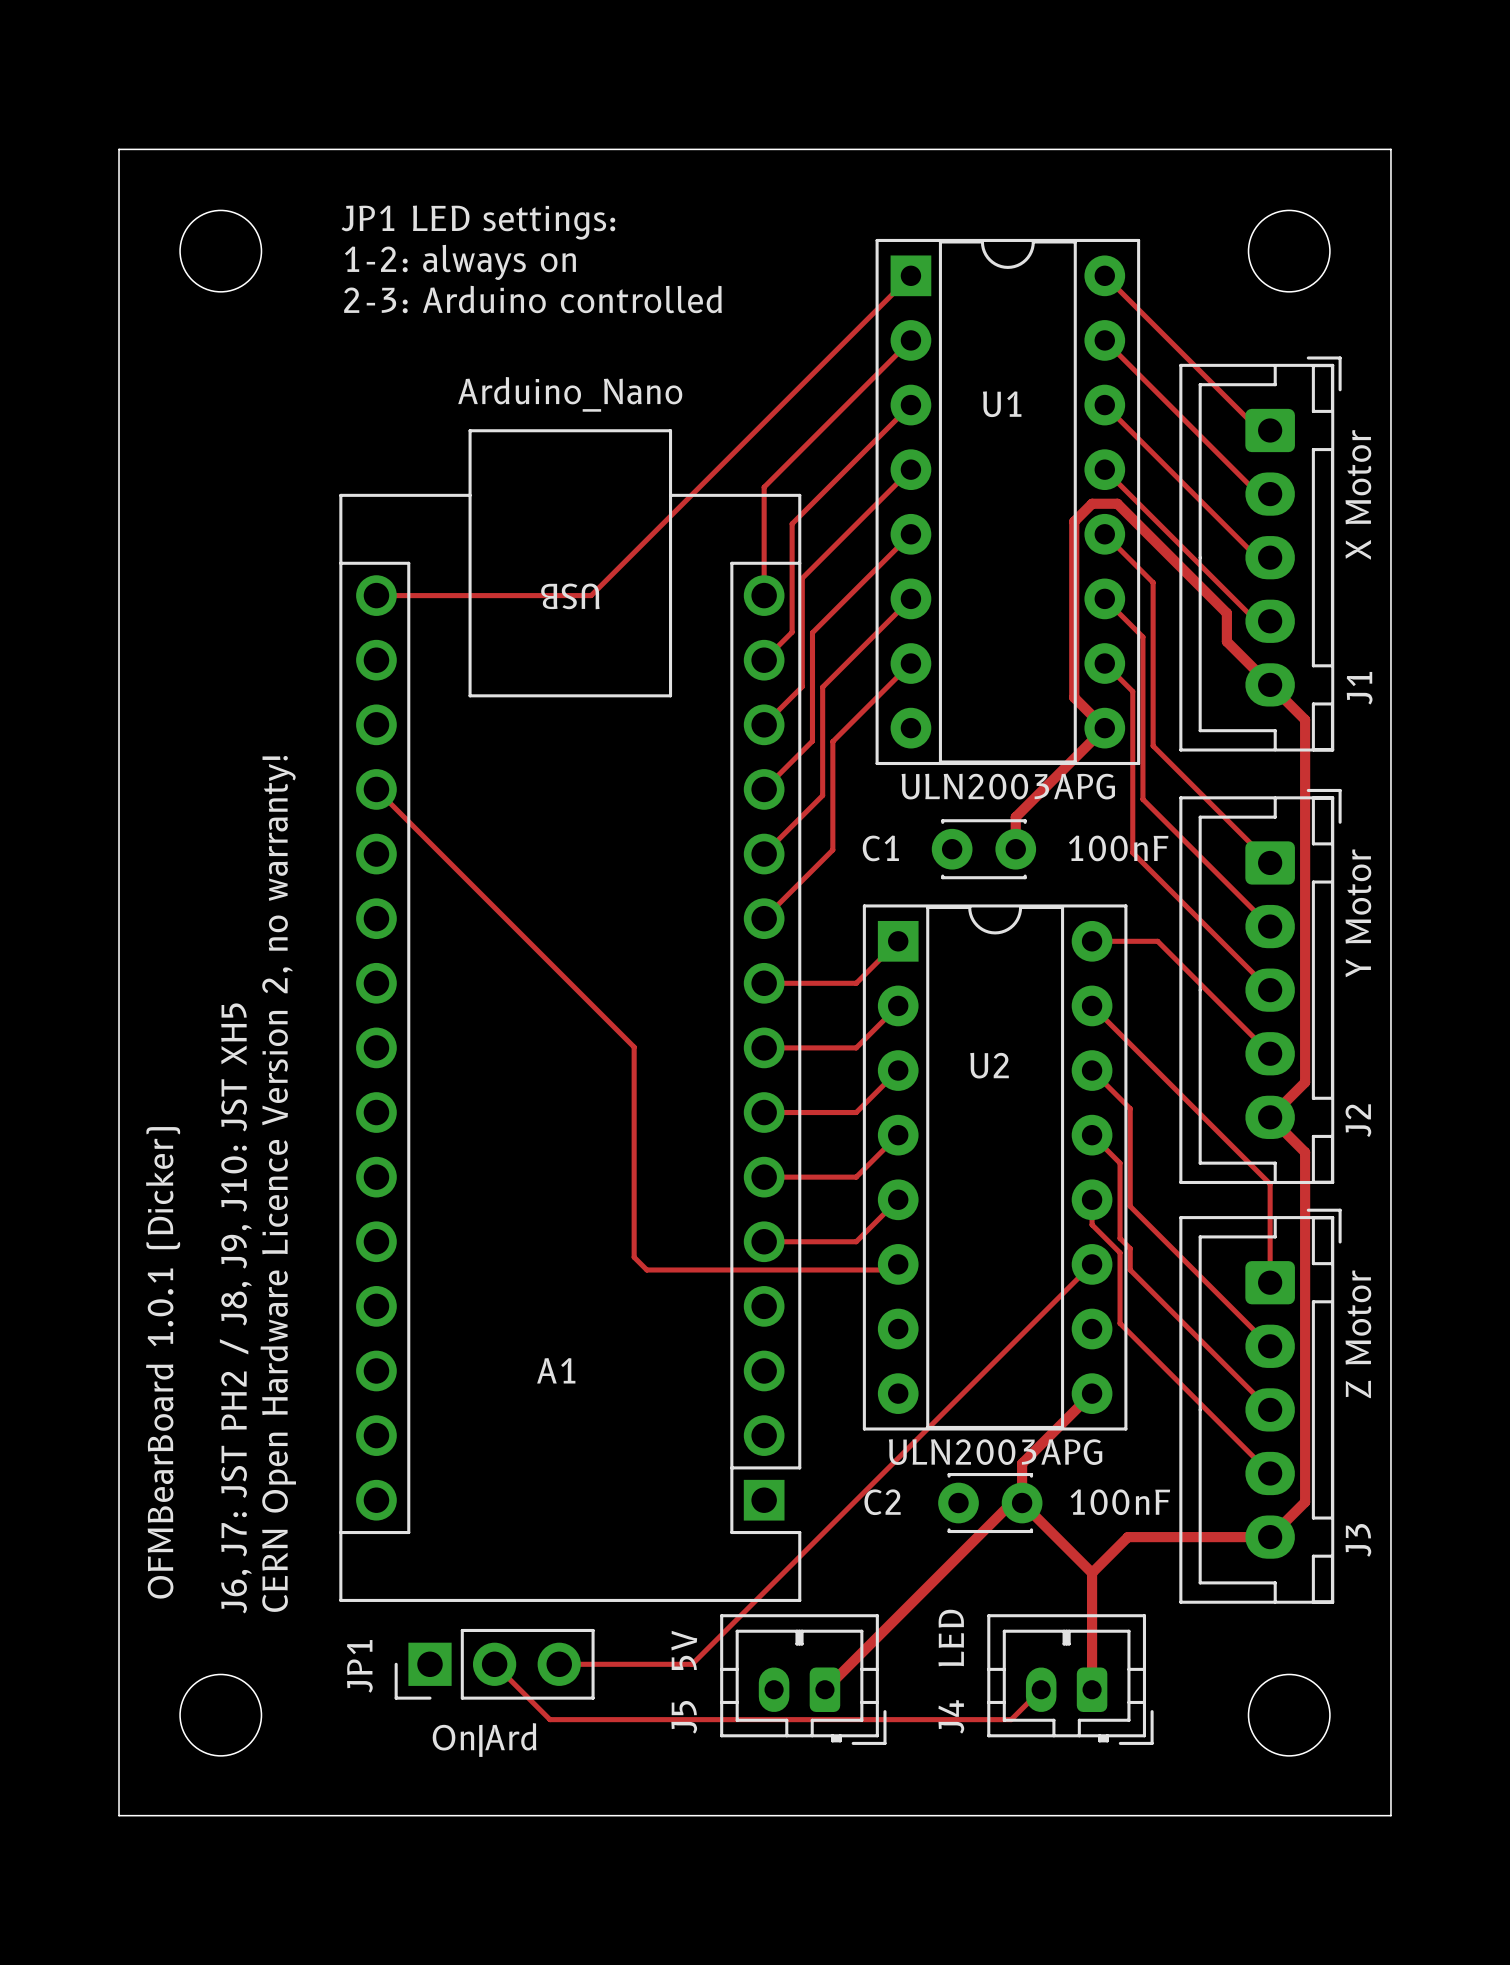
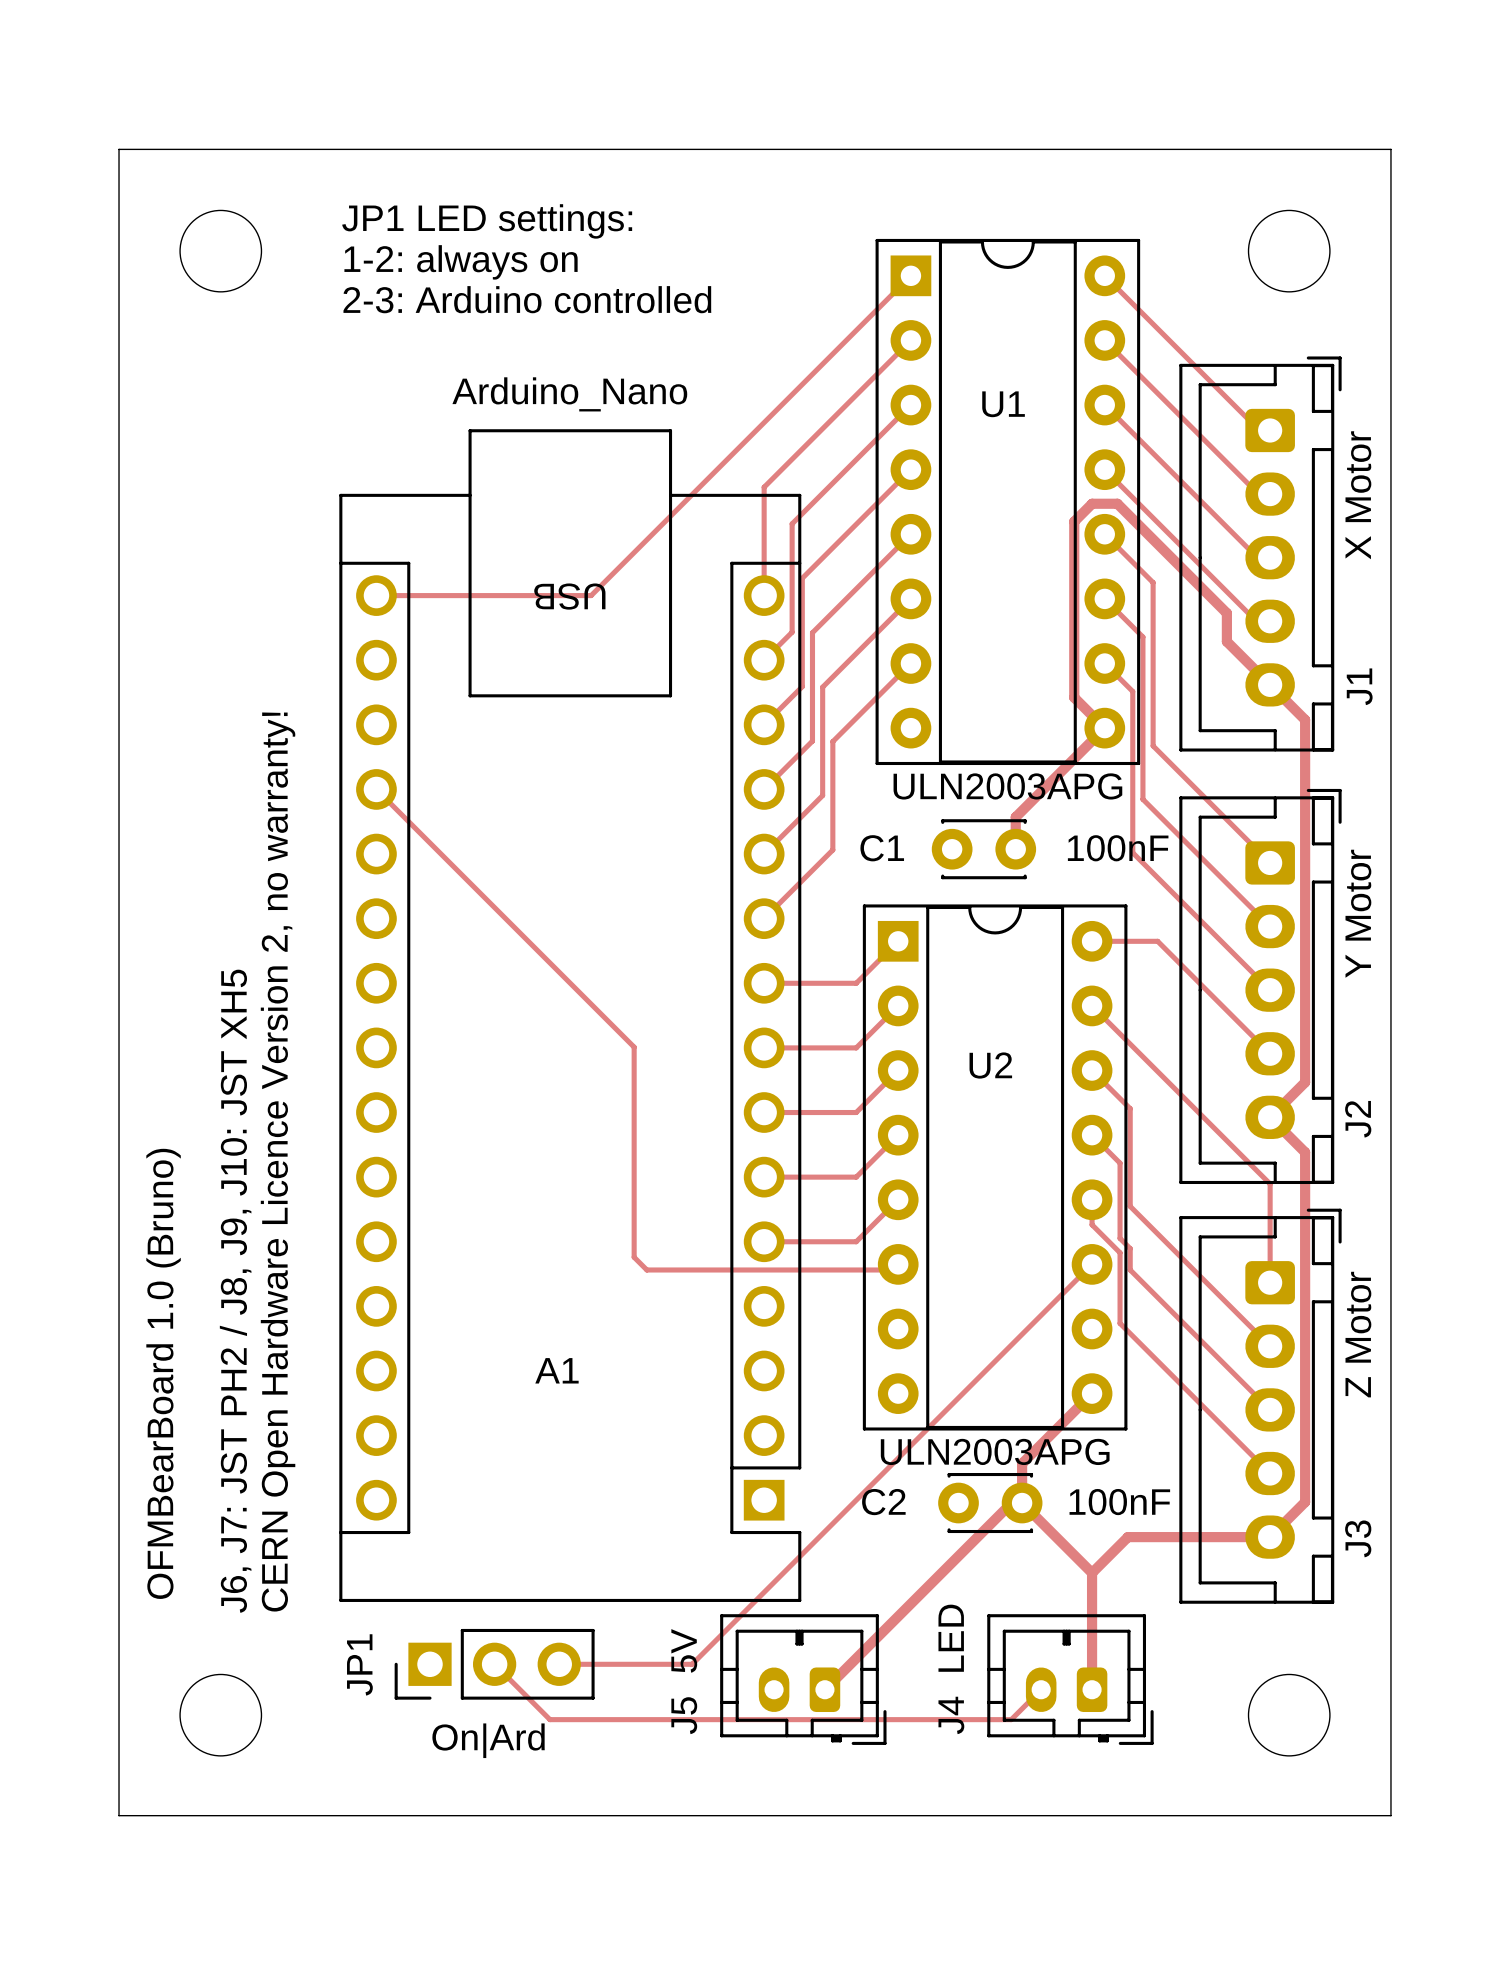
text: OFMBearBoard 1.0.1 (Dicker) (163, 1362) -> OFMBearBoard 1.0 (Bruno) (163, 1373)

